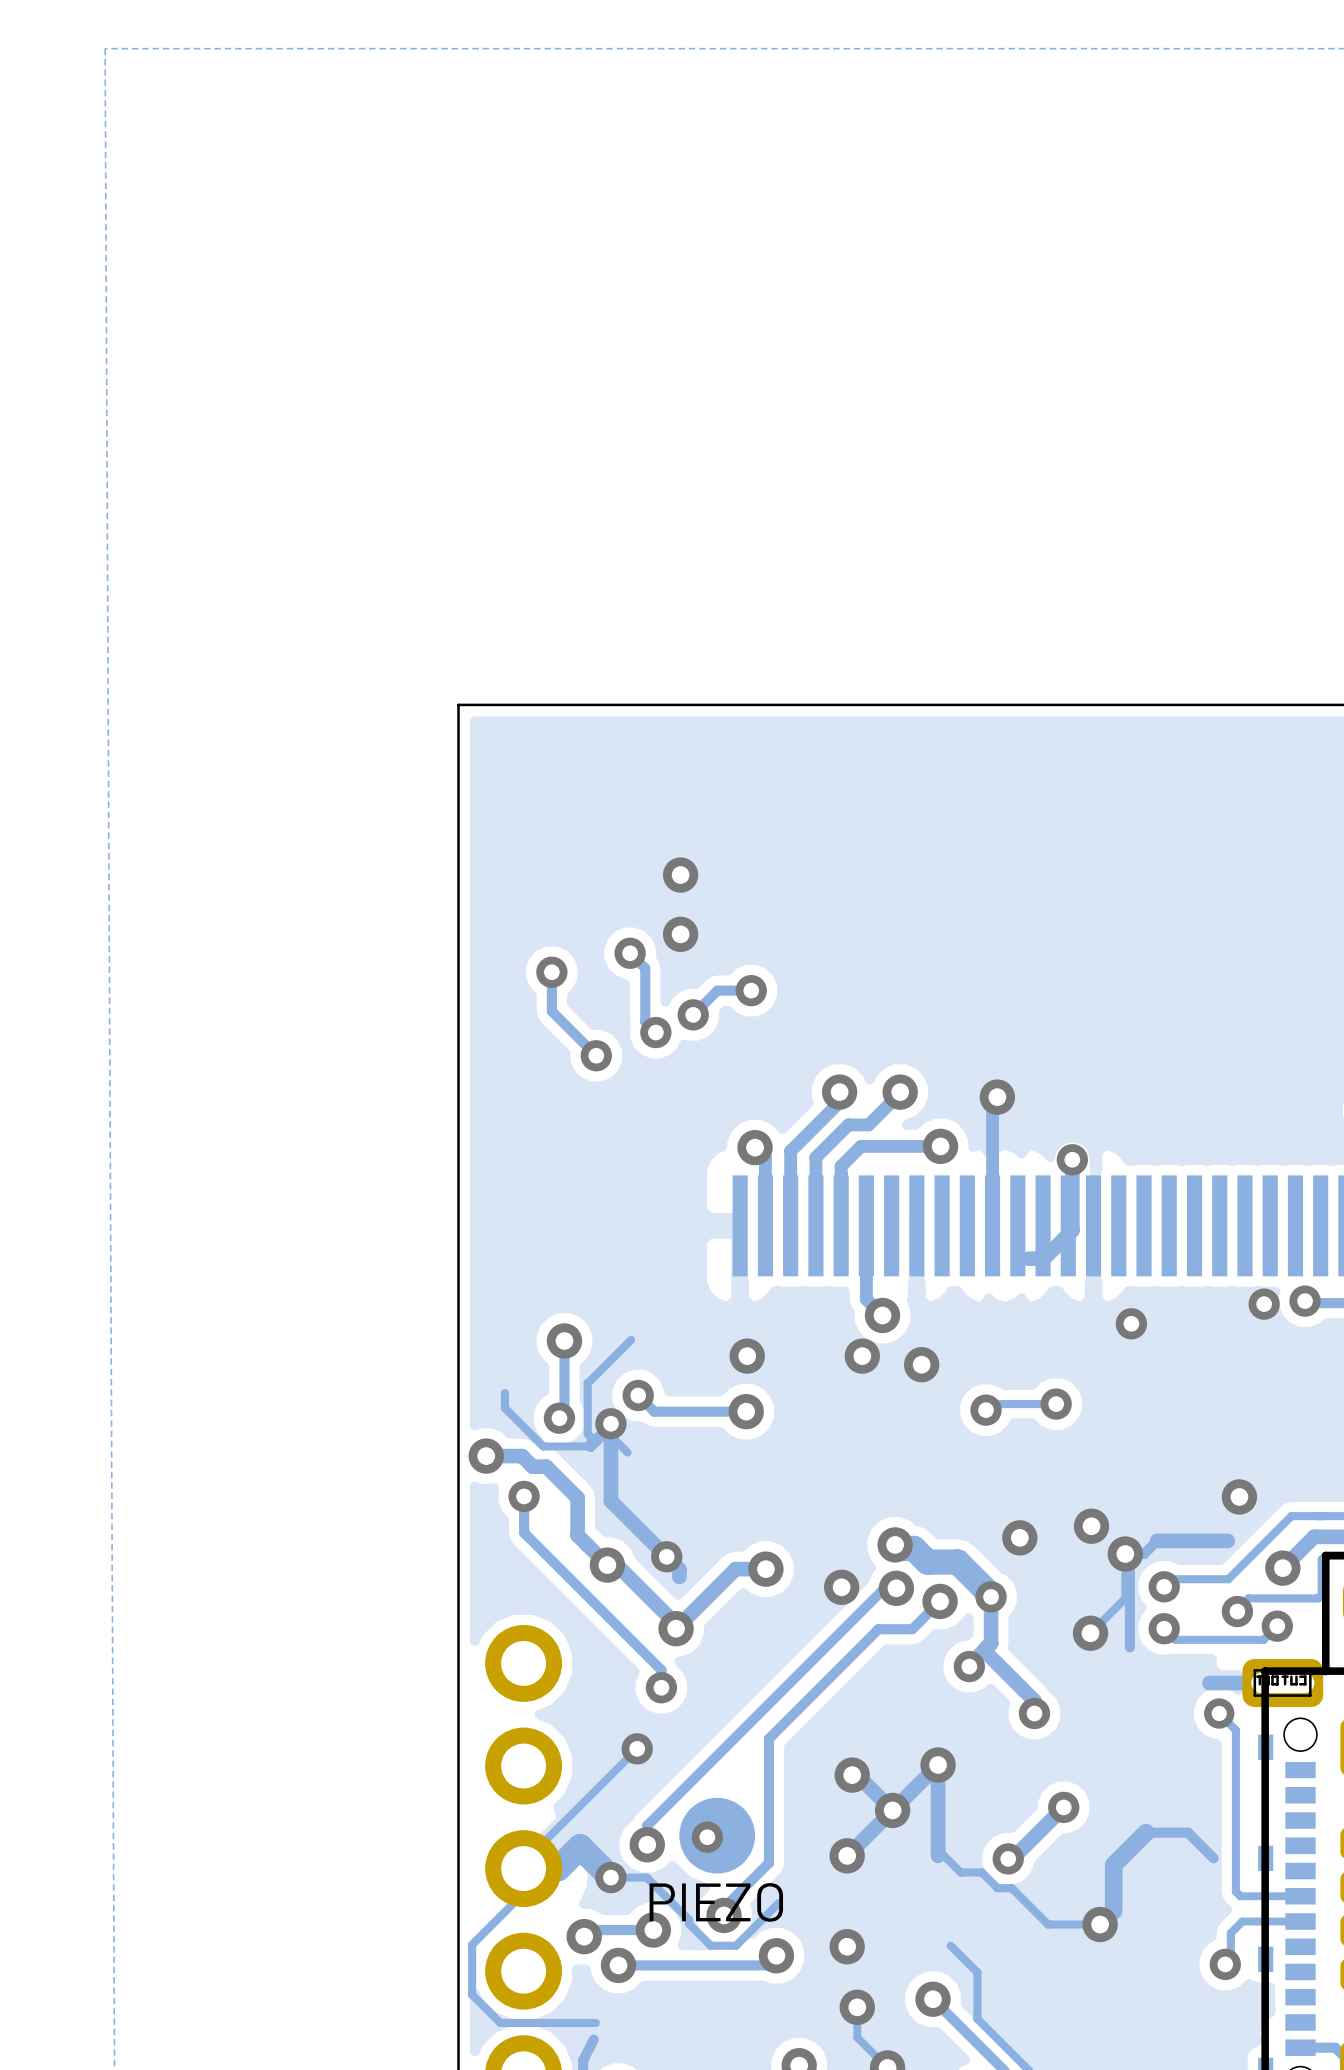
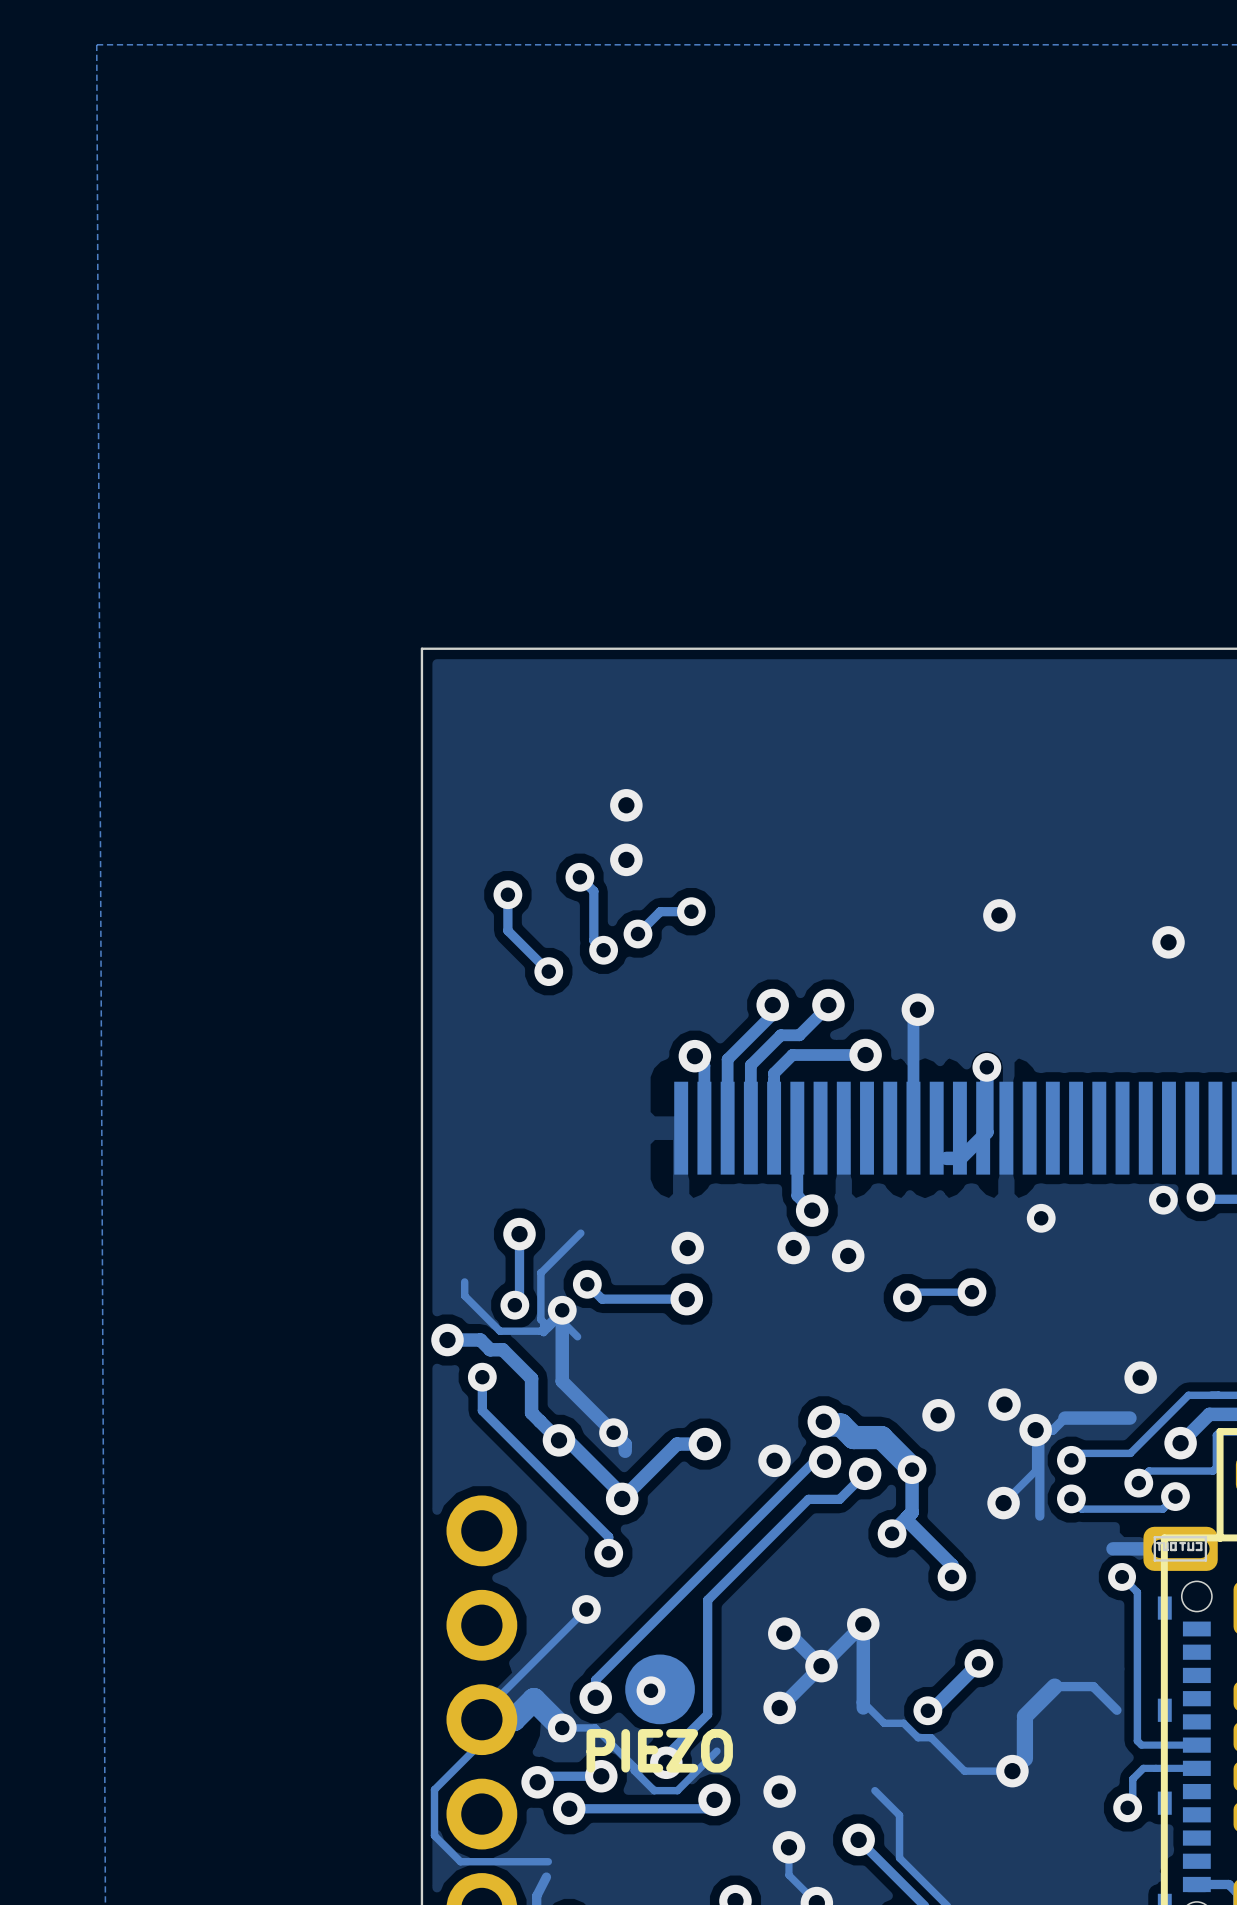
via: none -> (999, 915)
via: none -> (1168, 942)

